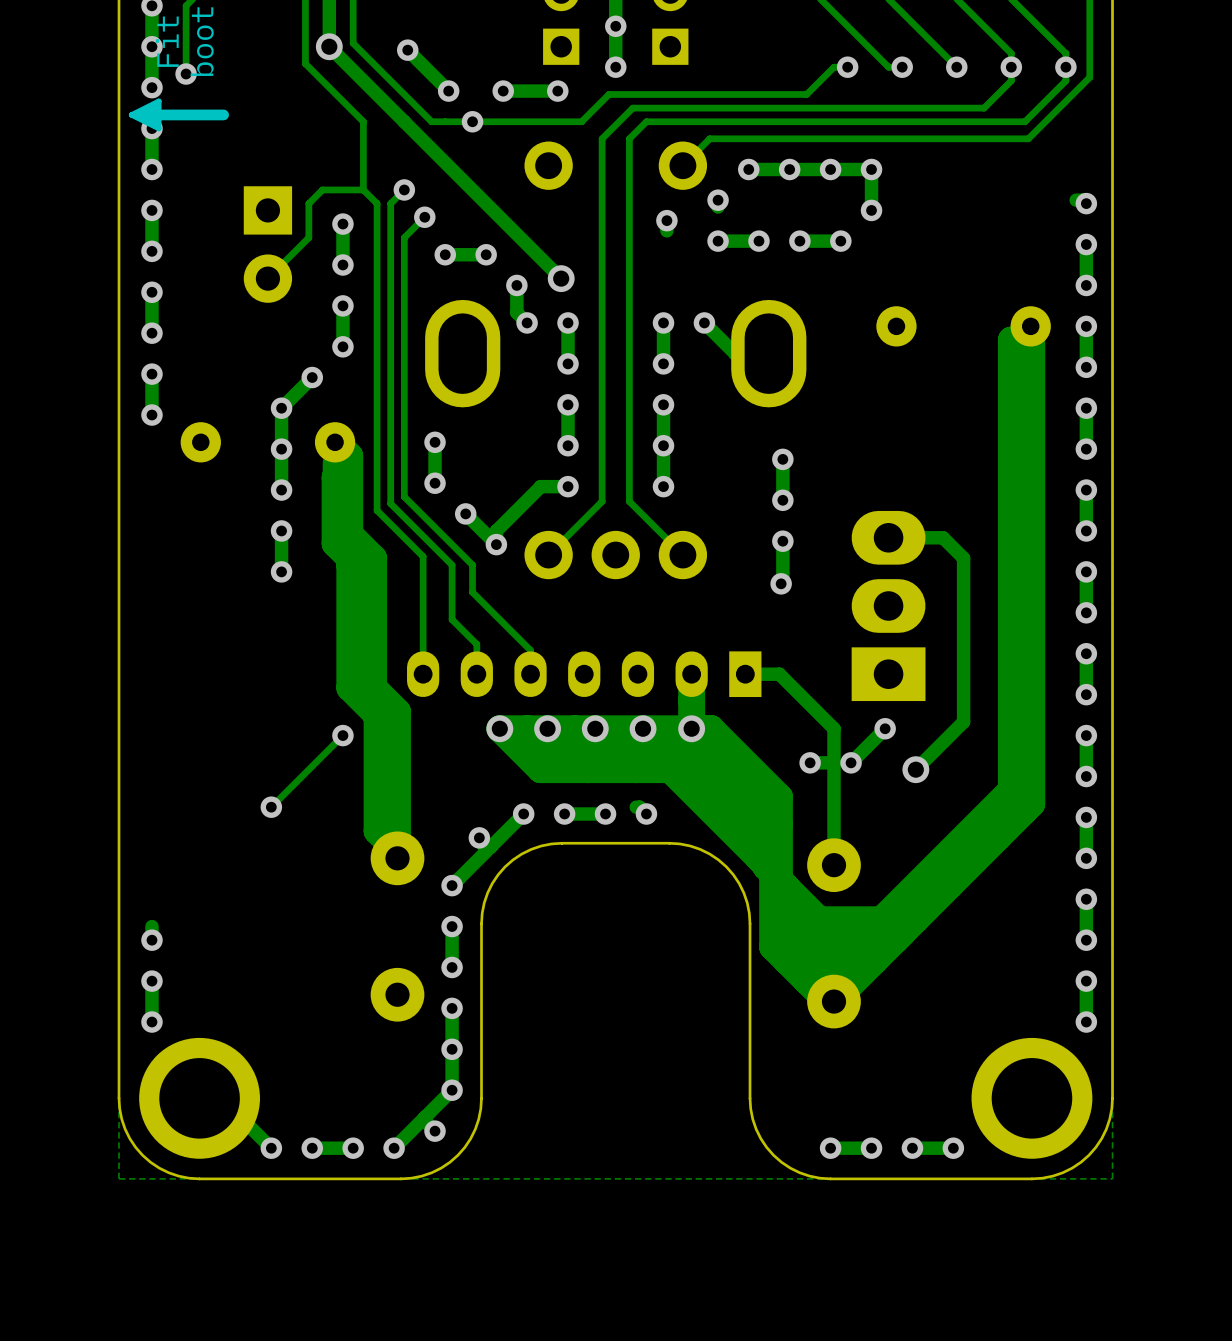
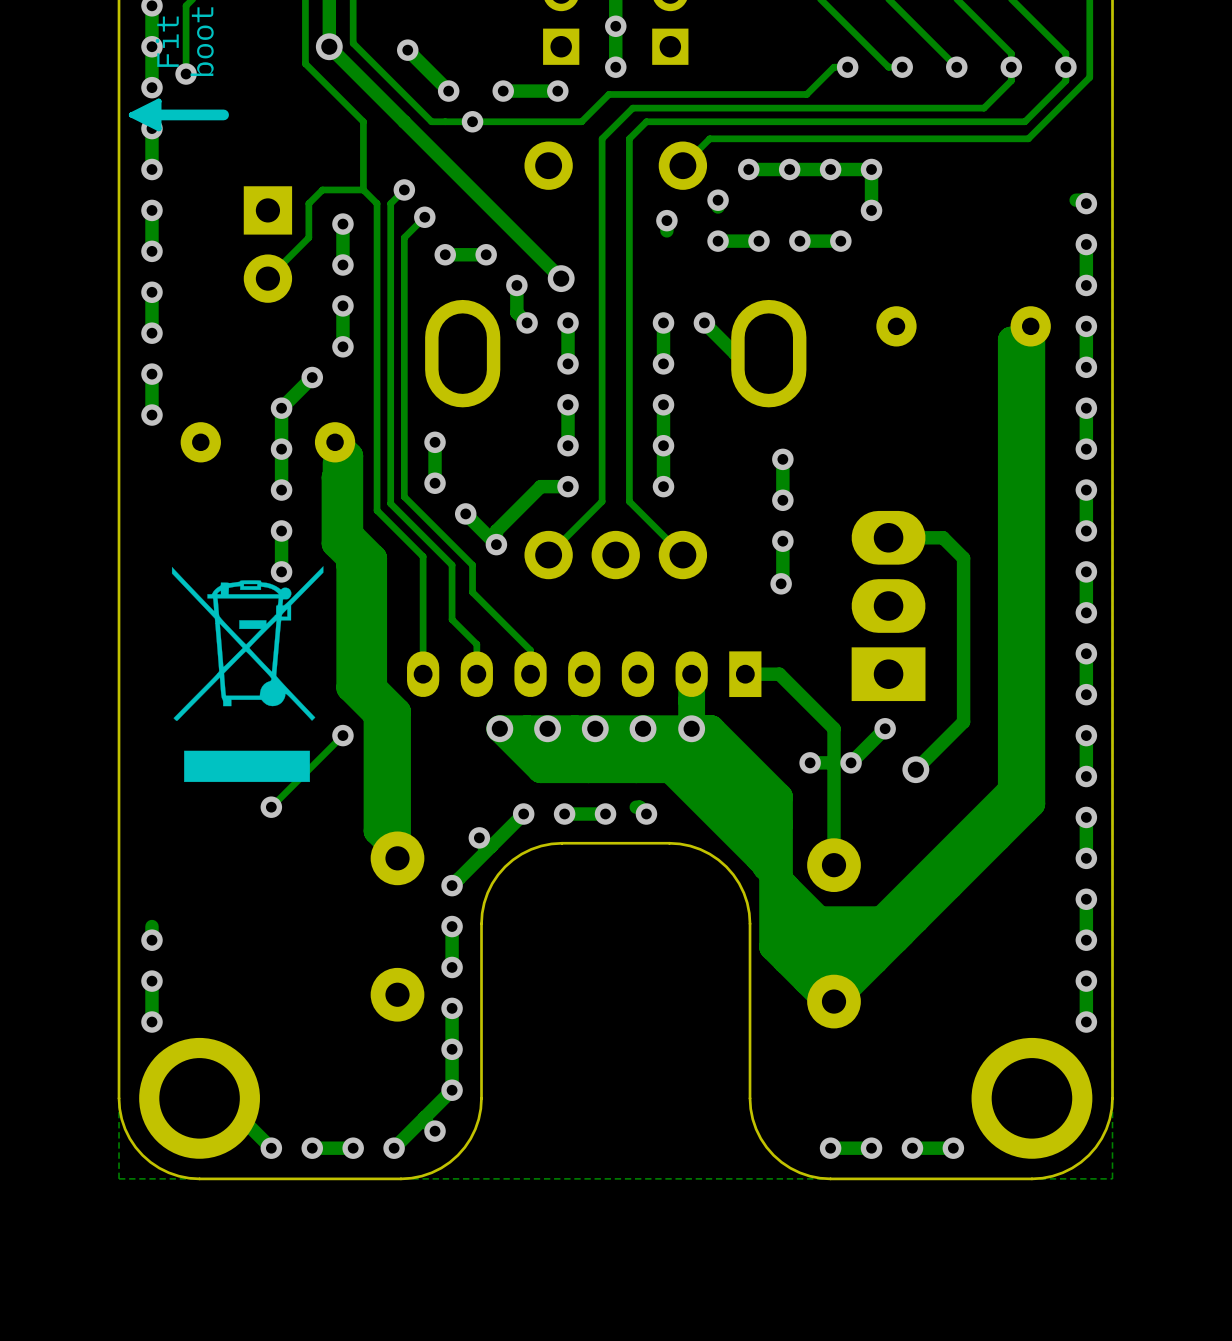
drawing: none -> [171, 566, 324, 783]

